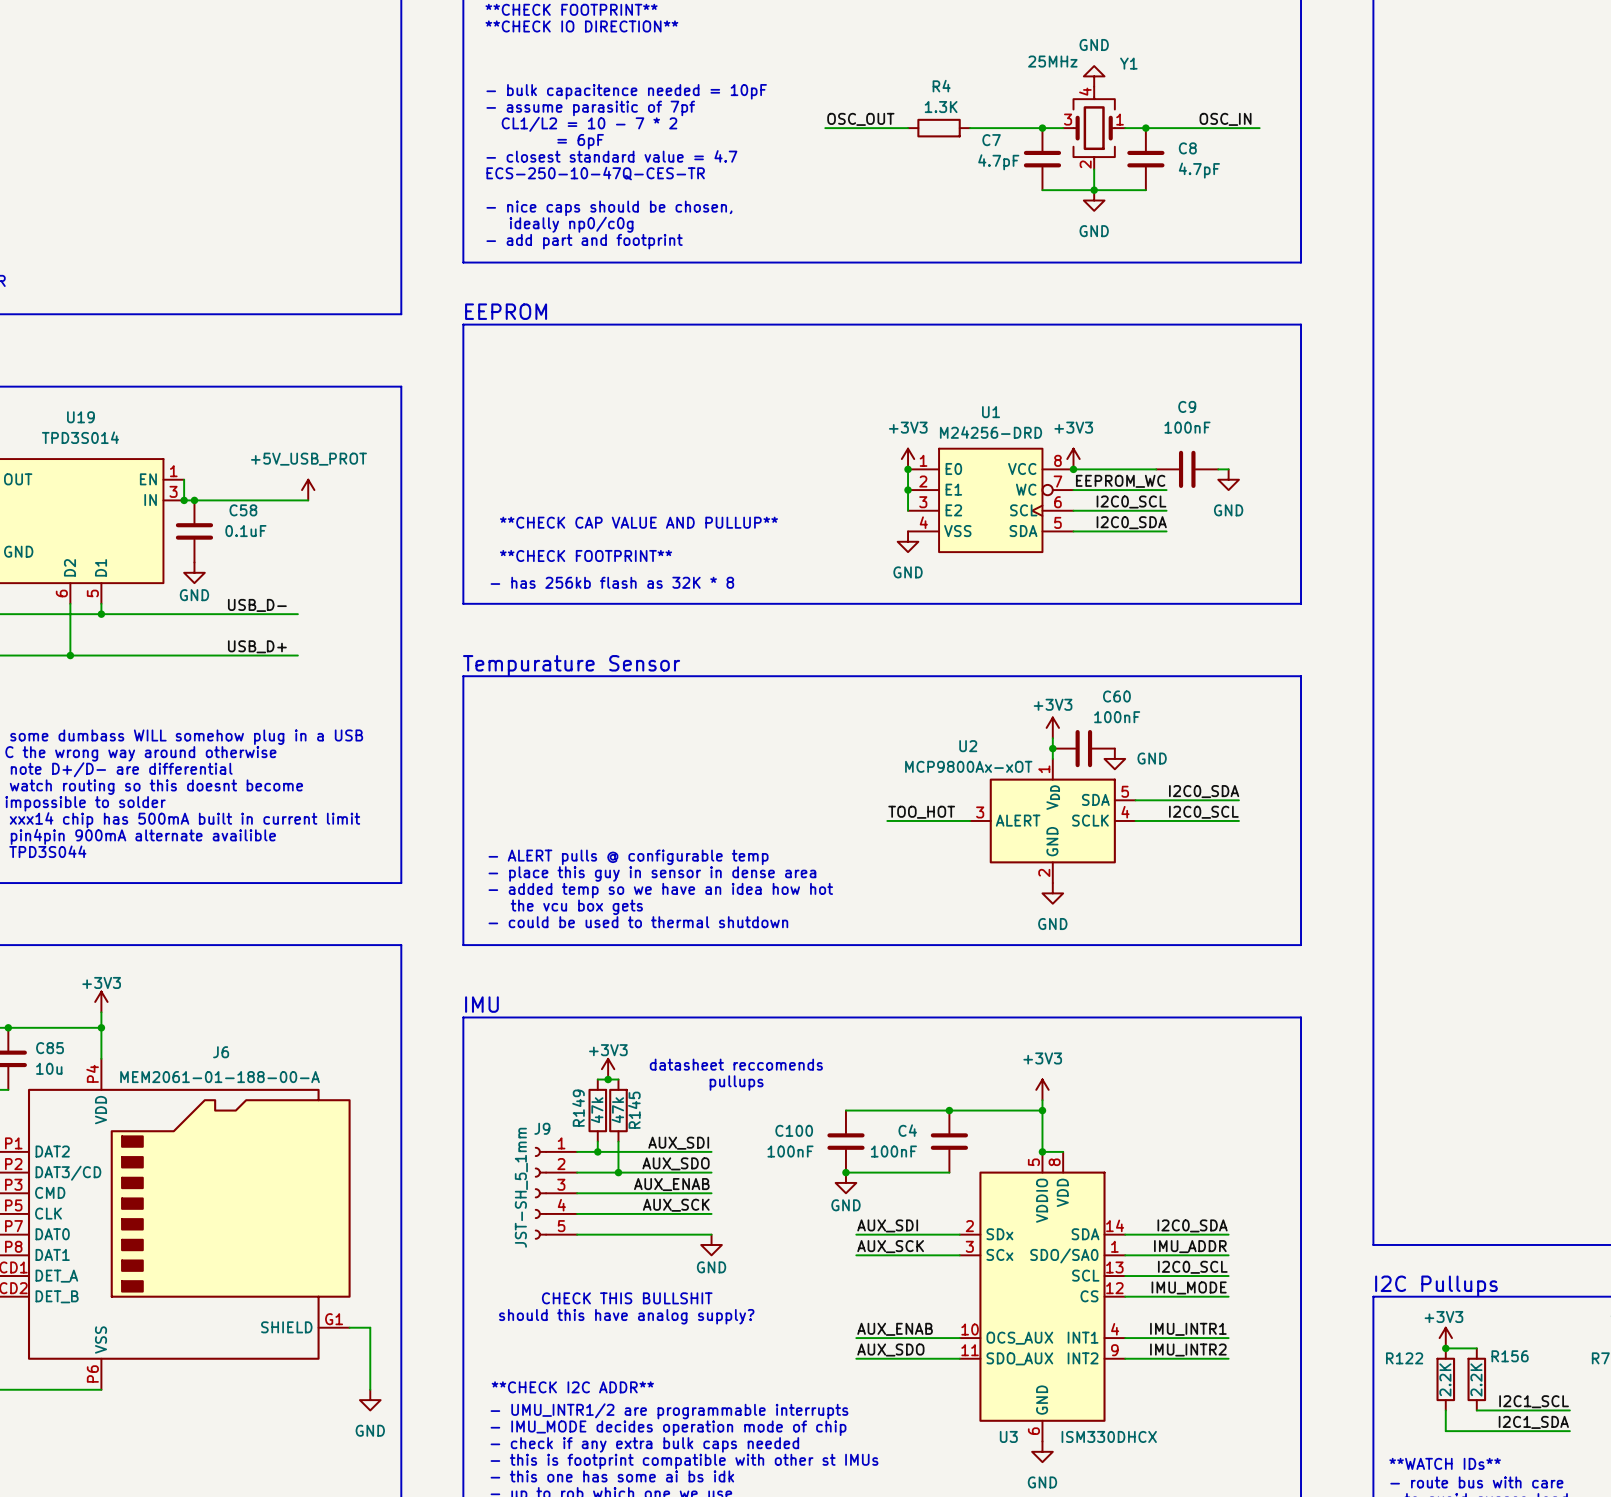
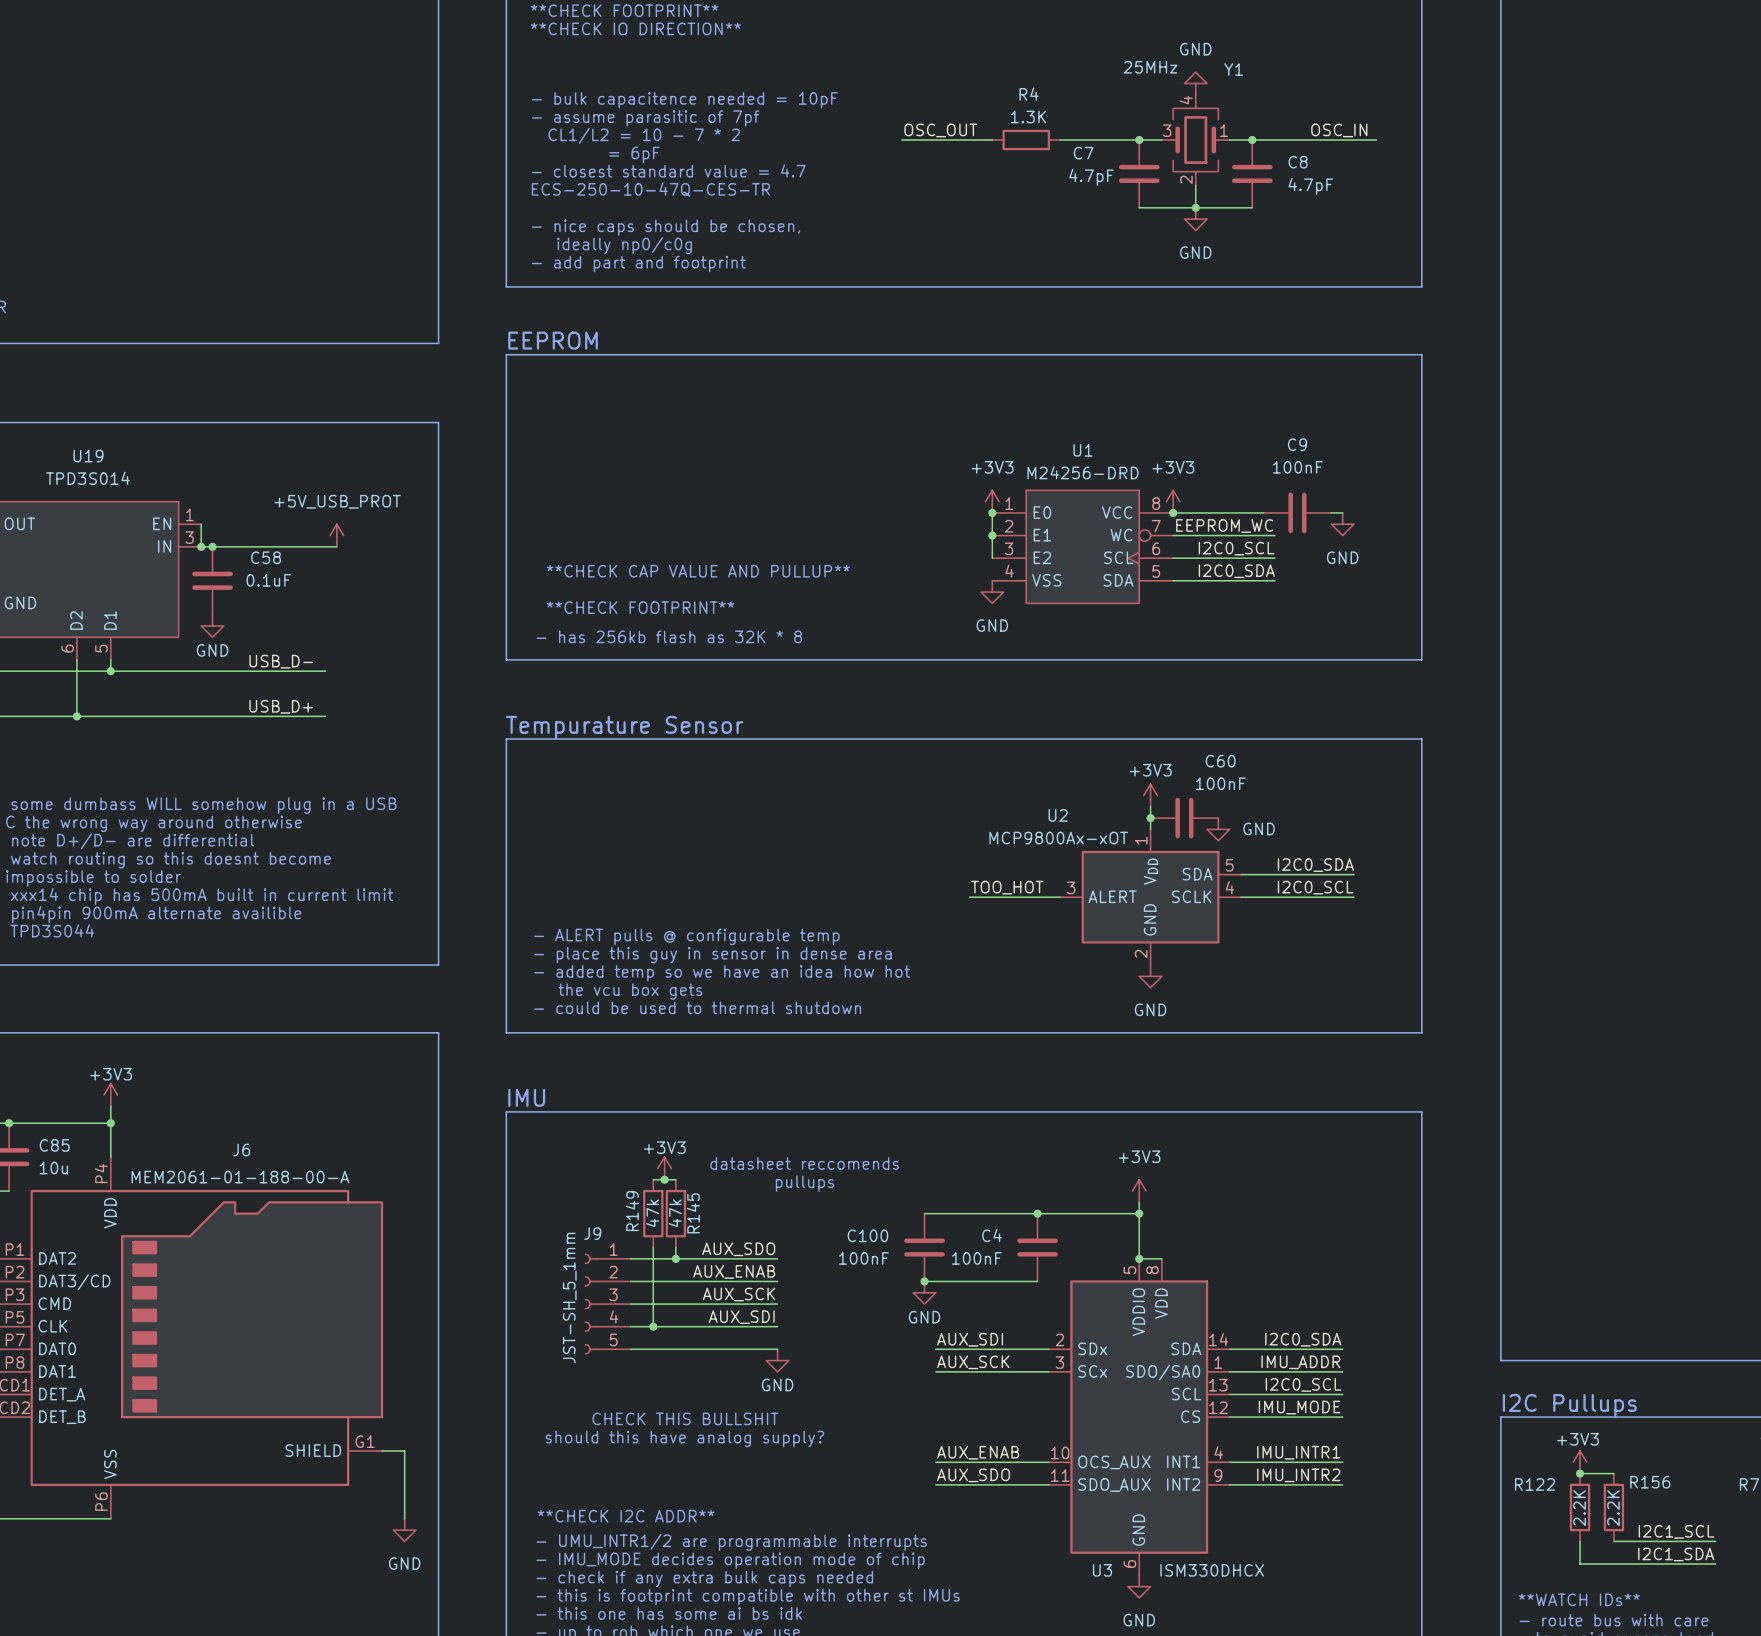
label: AUX_SDI (678, 1143) -> AUX_SDO (738, 1249)
wire: none -> (653, 1258) (653, 1326)
junction: (597, 1151) -> none
wire: (618, 1151) (618, 1172) -> none
junction: none -> (675, 1258)
label: AUX_SDO (676, 1163) -> AUX_ENAB (734, 1271)
junction: (618, 1172) -> none
label: AUX_ENAB (671, 1184) -> AUX_SCK (739, 1294)
label: AUX_SCK (676, 1205) -> AUX_SDI (741, 1317)
junction: none -> (653, 1326)

